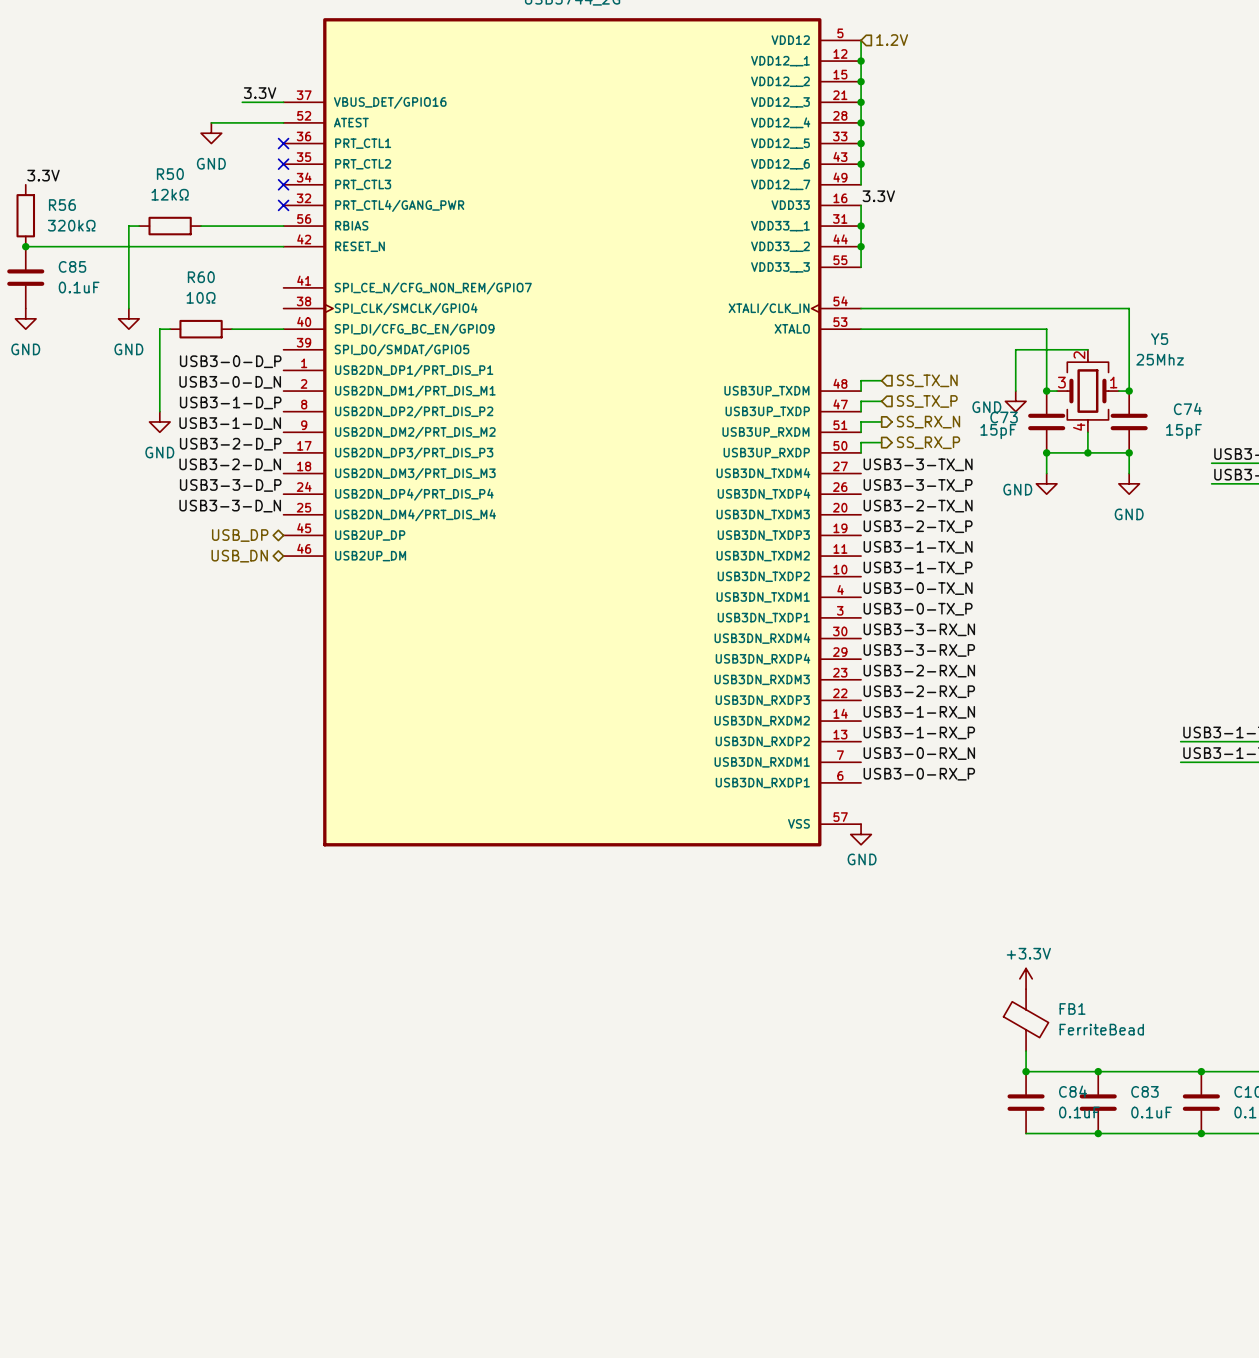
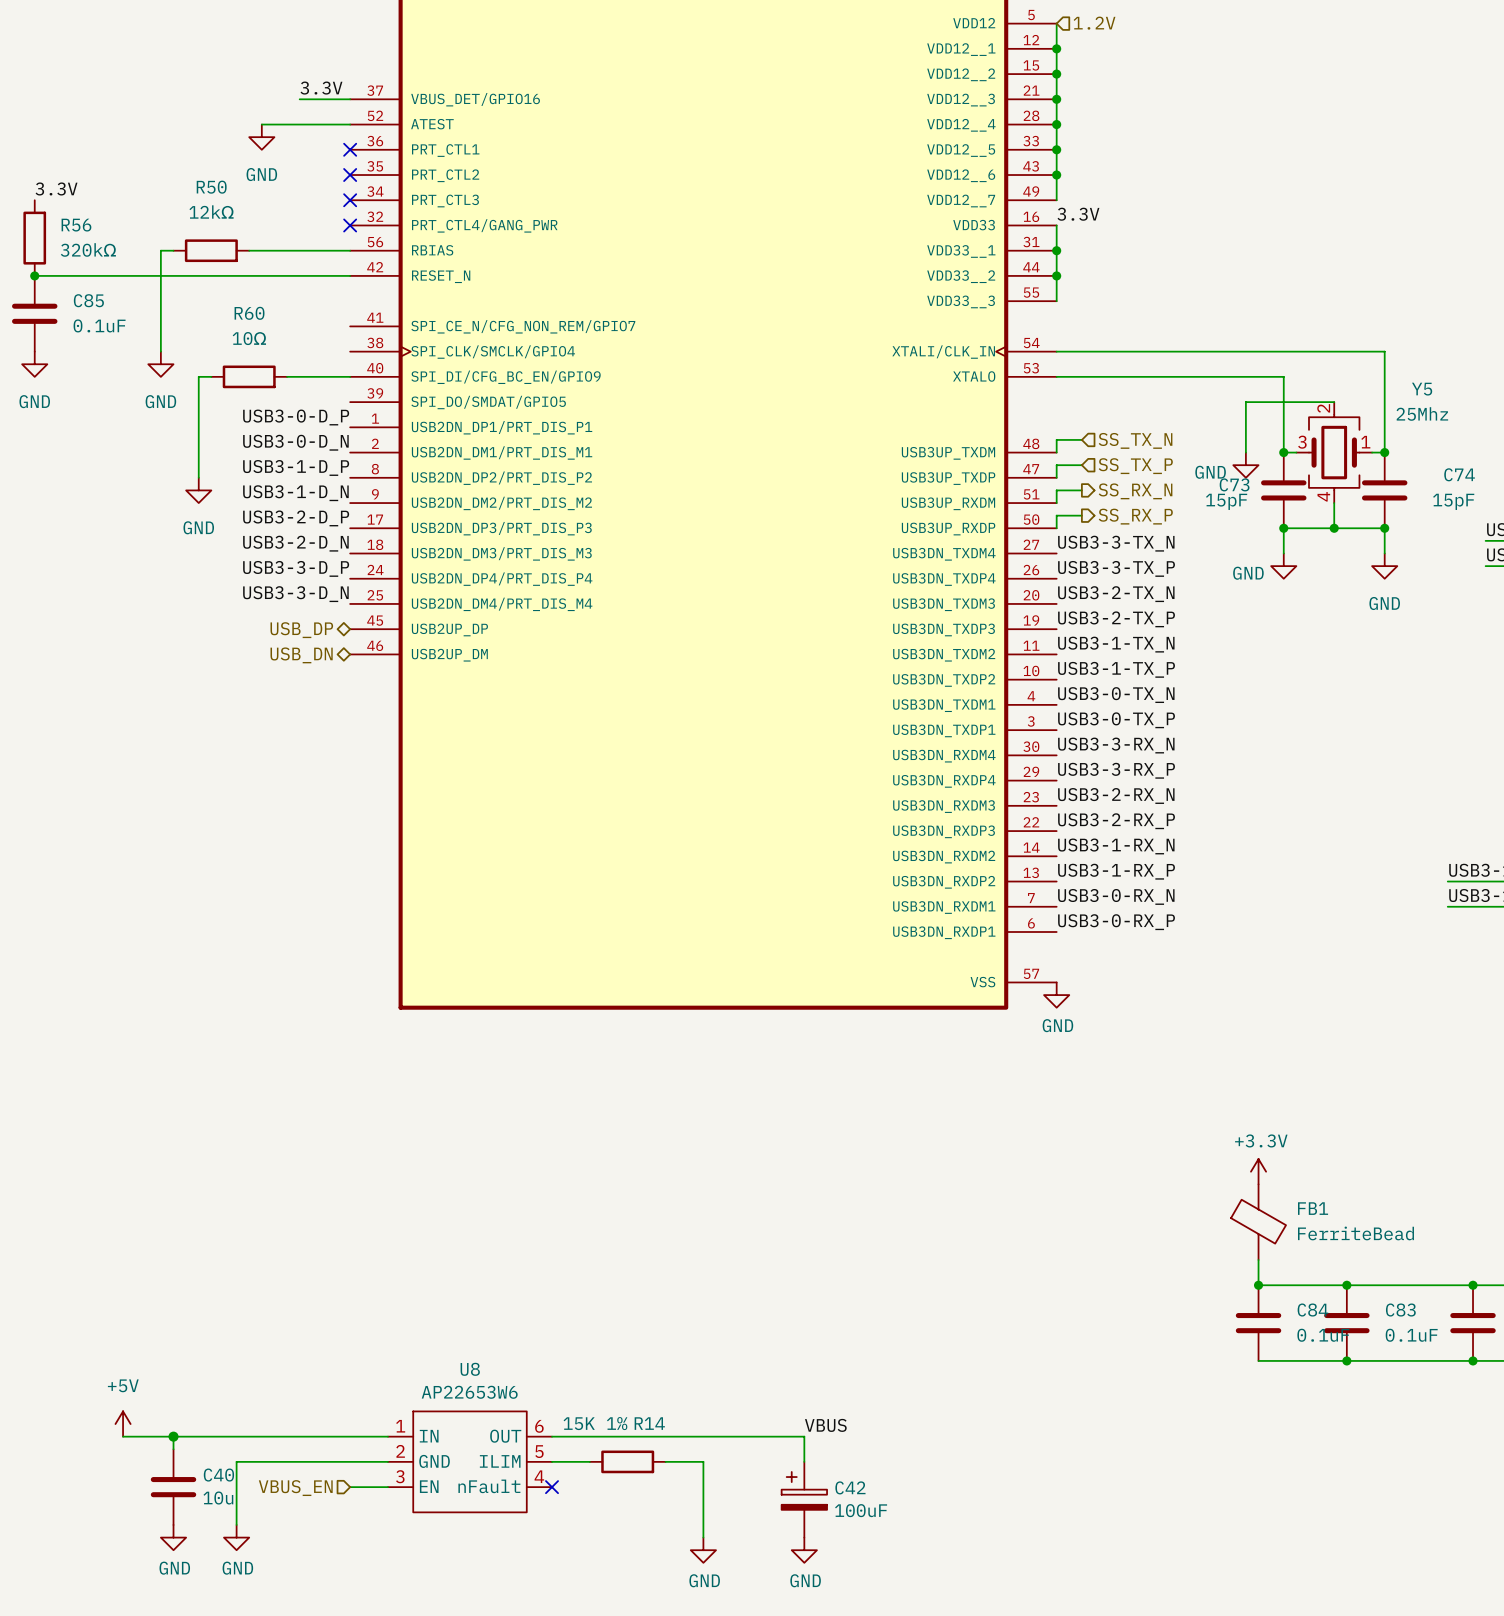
power symbol: none -> +5V (123, 1424)
label: none -> VBUS (825, 1425)
wire: none -> (123, 1436) (387, 1436)
wire: none -> (173, 1436) (173, 1449)
junction: none -> (173, 1436)
wire: none -> (552, 1436) (804, 1436) (804, 1461)
wire: none -> (387, 1461) (236, 1461) (236, 1524)
U8: none -> AP22653W6 (470, 1461)
wire: none -> (552, 1461) (589, 1461)
R14: none -> 15K 1% (627, 1461)
wire: none -> (665, 1461) (703, 1461) (703, 1537)
C40: none -> 10u (173, 1487)
hierarchical label: none -> VBUS_EN (295, 1488)
wire: none -> (350, 1487) (387, 1487)
no-connect mark: none -> (552, 1487)
C42: none -> 100uF (804, 1499)
power symbol: none -> GND (173, 1537)
power symbol: none -> GND (236, 1537)
power symbol: none -> GND (703, 1550)
power symbol: none -> GND (804, 1550)

